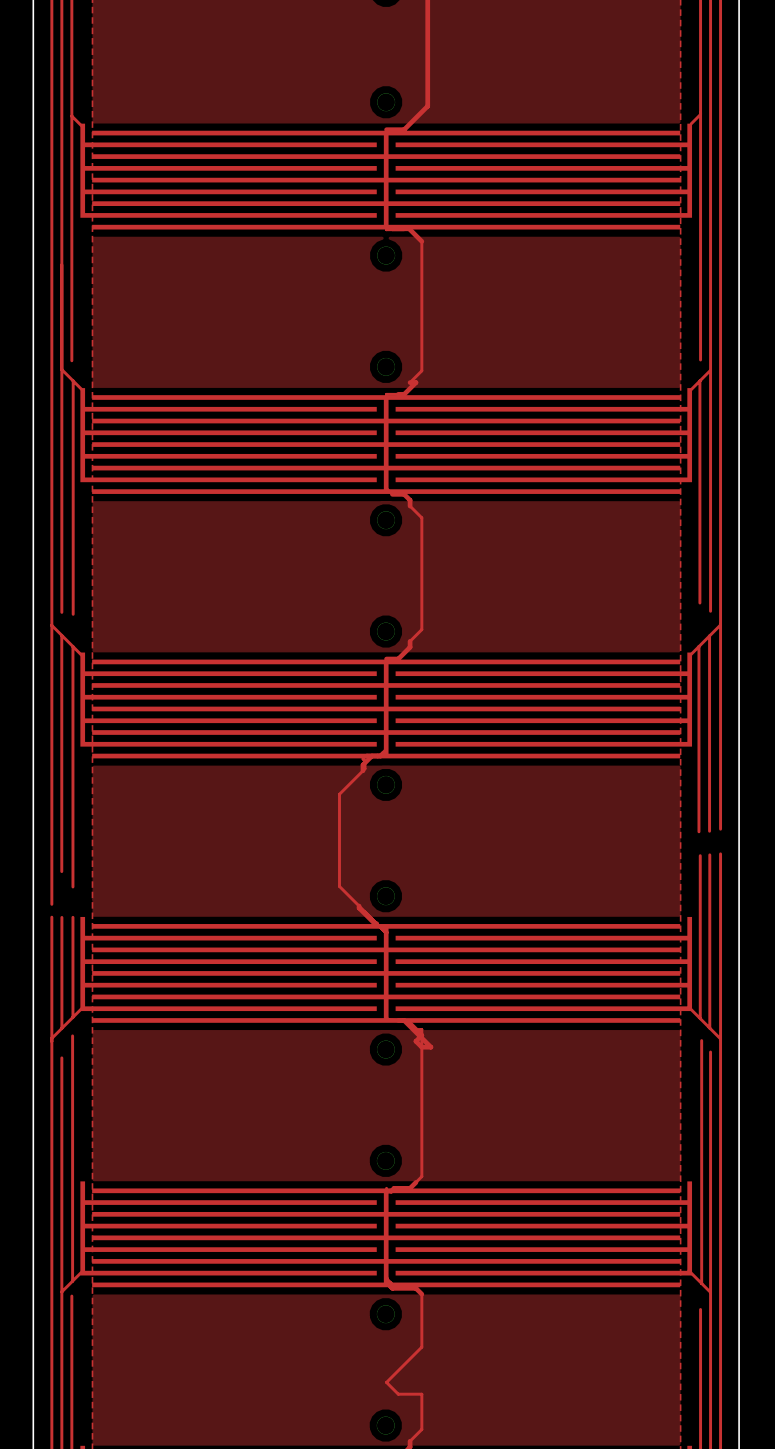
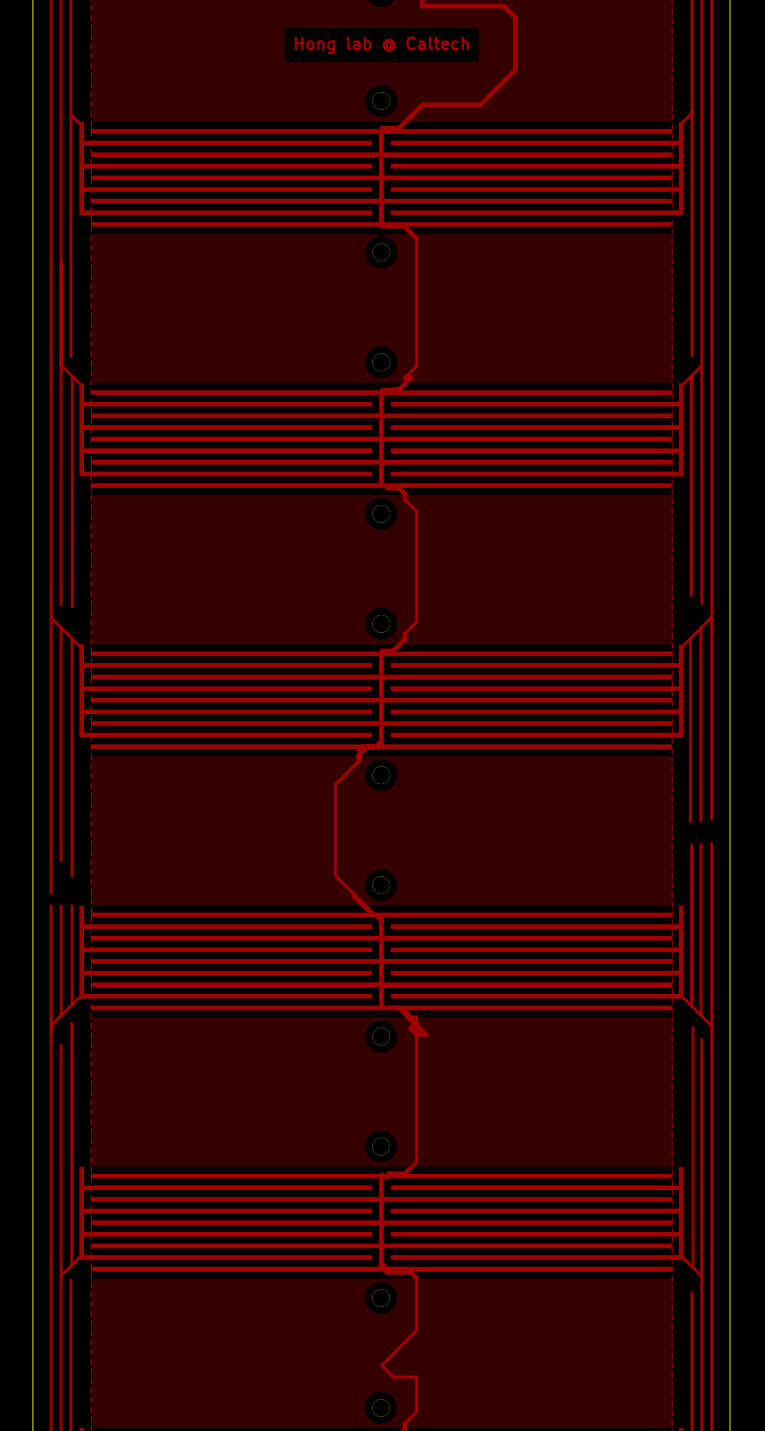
track: (427, 6) (427, 106) -> (422, 6) (503, 6) (515, 17) (515, 70) (480, 104) (422, 104)
text: none -> Hong lab @ Caltech (381, 45)

